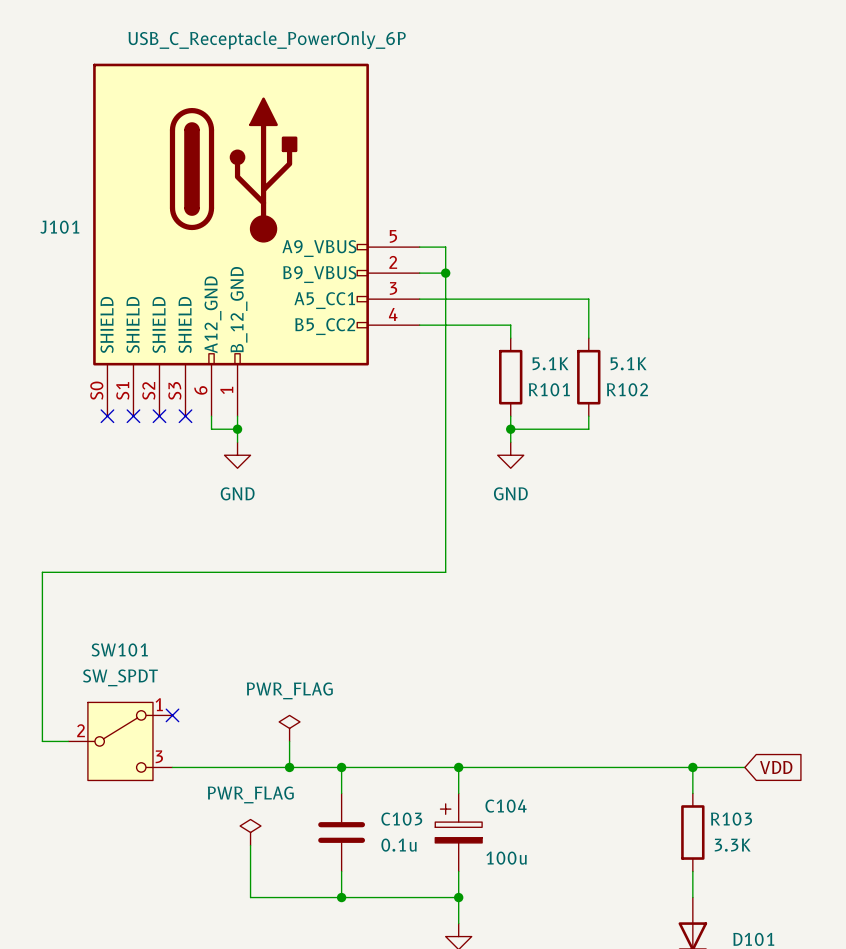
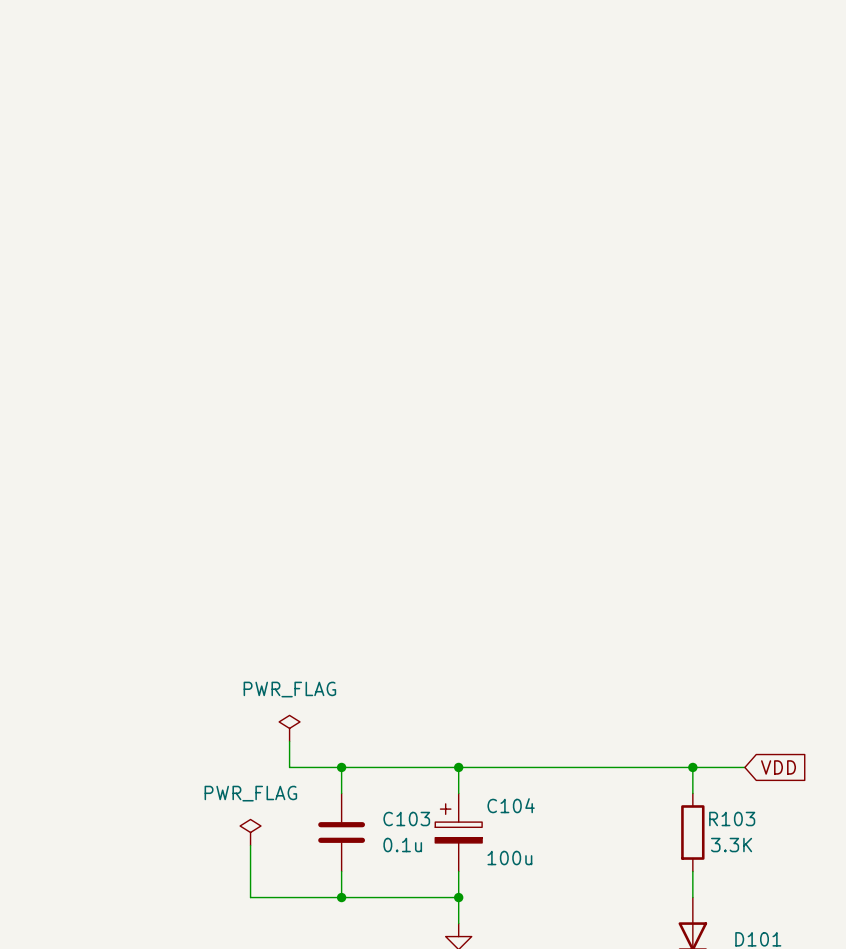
J101: USB_C_Receptacle_PowerOnly_6P (256, 239) -> none
wire: (419, 247) (445, 247) (445, 572) (42, 572) (42, 741) (68, 741) -> none
wire: (419, 273) (445, 273) -> none
junction: (445, 273) -> none
wire: (419, 299) (588, 299) (588, 338) -> none
wire: (419, 325) (510, 325) (510, 338) -> none
R101: 5.1K (510, 377) -> none
R102: 5.1K (588, 377) -> none
no-connect mark: (107, 416) -> none
no-connect mark: (133, 416) -> none
no-connect mark: (159, 416) -> none
no-connect mark: (185, 416) -> none
wire: (211, 416) (211, 429) (237, 429) -> none
wire: (237, 416) (237, 442) -> none
wire: (510, 416) (510, 442) -> none
wire: (588, 416) (588, 429) (510, 429) -> none
junction: (237, 429) -> none
junction: (510, 429) -> none
power symbol: GND (237, 455) -> none
power symbol: GND (510, 455) -> none
no-connect mark: (172, 715) -> none
SW101: SW_SPDT (120, 741) -> none
wire: (172, 767) (289, 767) -> none
junction: (289, 767) -> none

